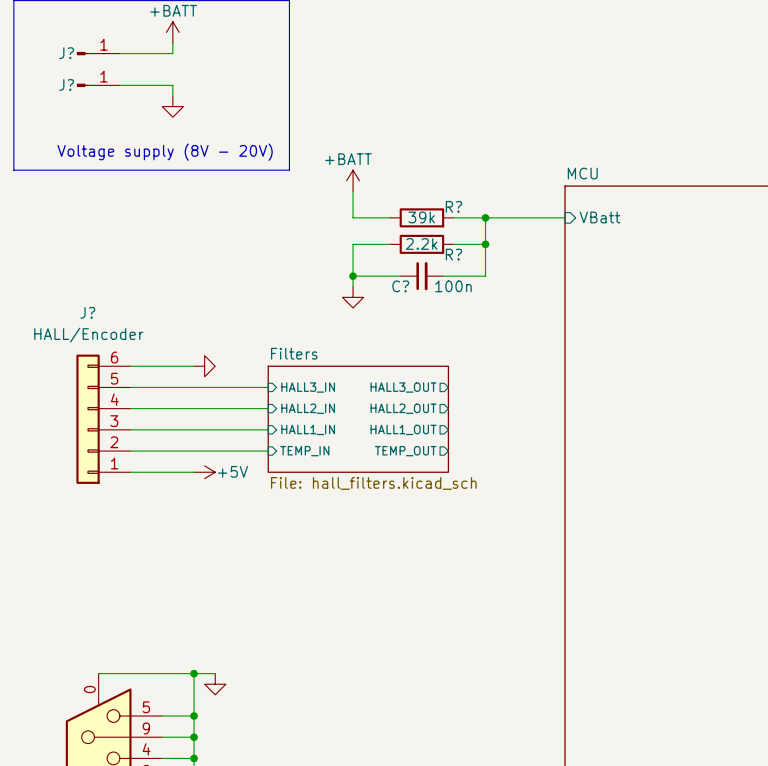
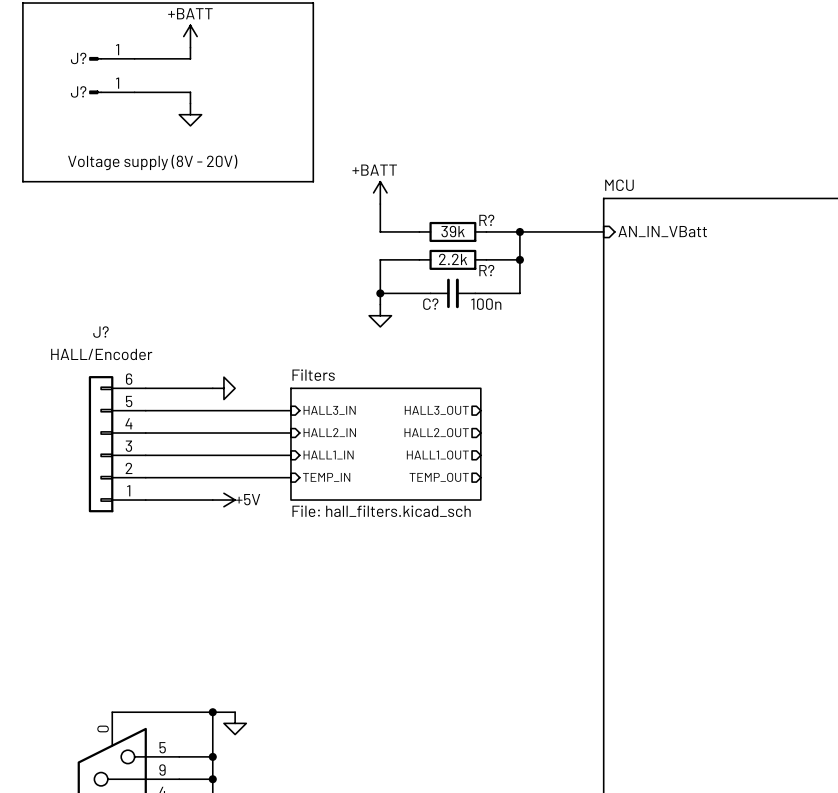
sheet pin: VBatt (600, 217) -> AN_IN_VBatt (662, 231)

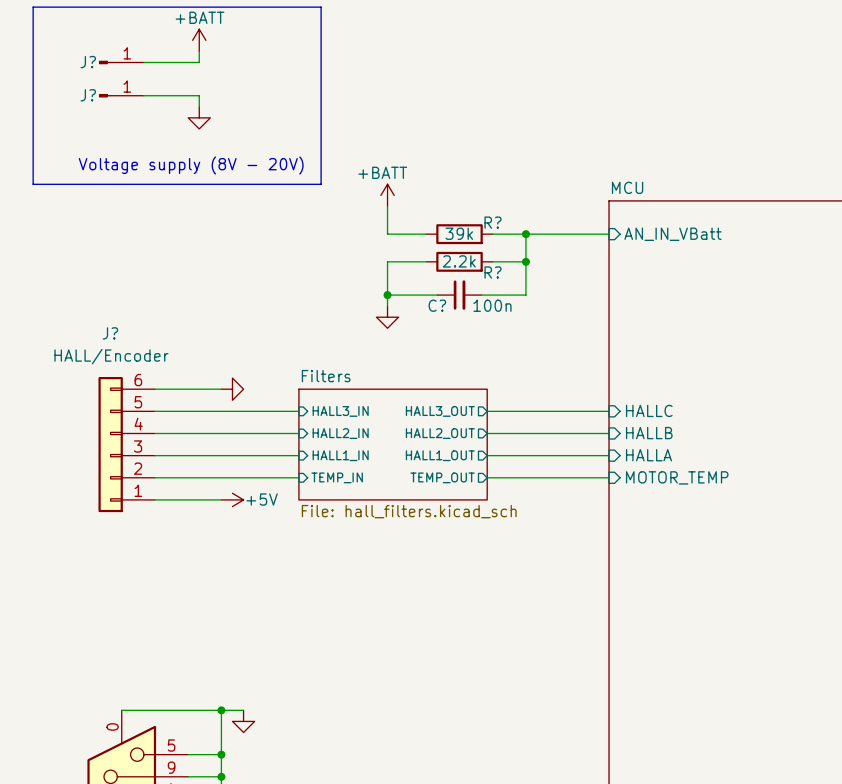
wire: none -> (487, 411) (609, 411)
sheet pin: none -> HALLC (649, 410)
sheet pin: none -> HALLB (649, 433)
wire: none -> (487, 433) (609, 433)
sheet pin: none -> HALLA (649, 455)
wire: none -> (487, 455) (609, 455)
wire: none -> (487, 477) (609, 477)
sheet pin: none -> MOTOR_TEMP (677, 477)

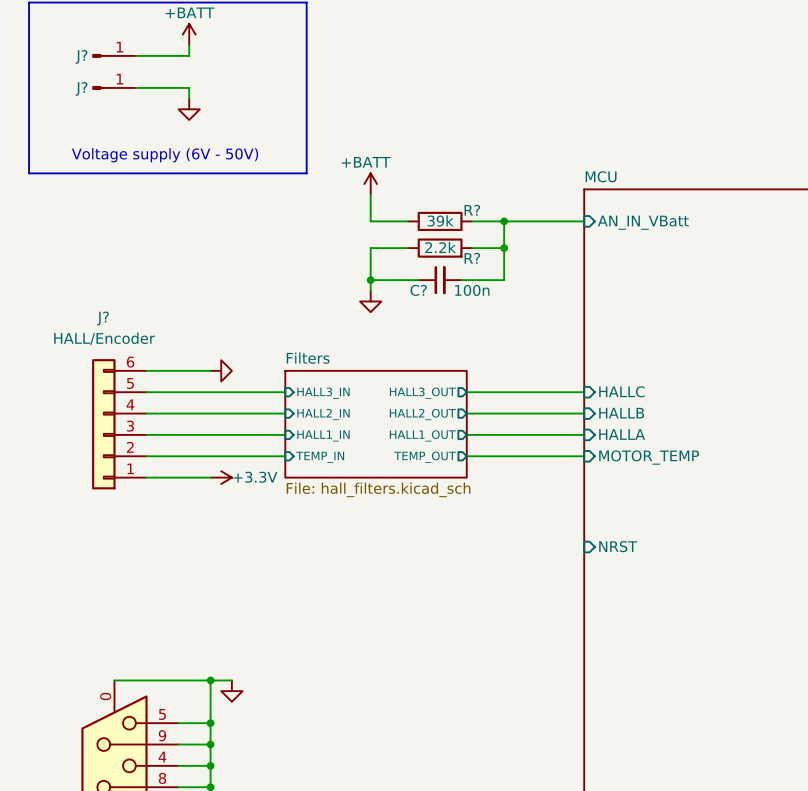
text: Voltage supply (8V - 20V) (191, 165) -> Voltage supply (6V - 50V) (165, 155)
power symbol: +5V (232, 499) -> +3.3V (221, 477)
sheet pin: none -> NRST (618, 546)

